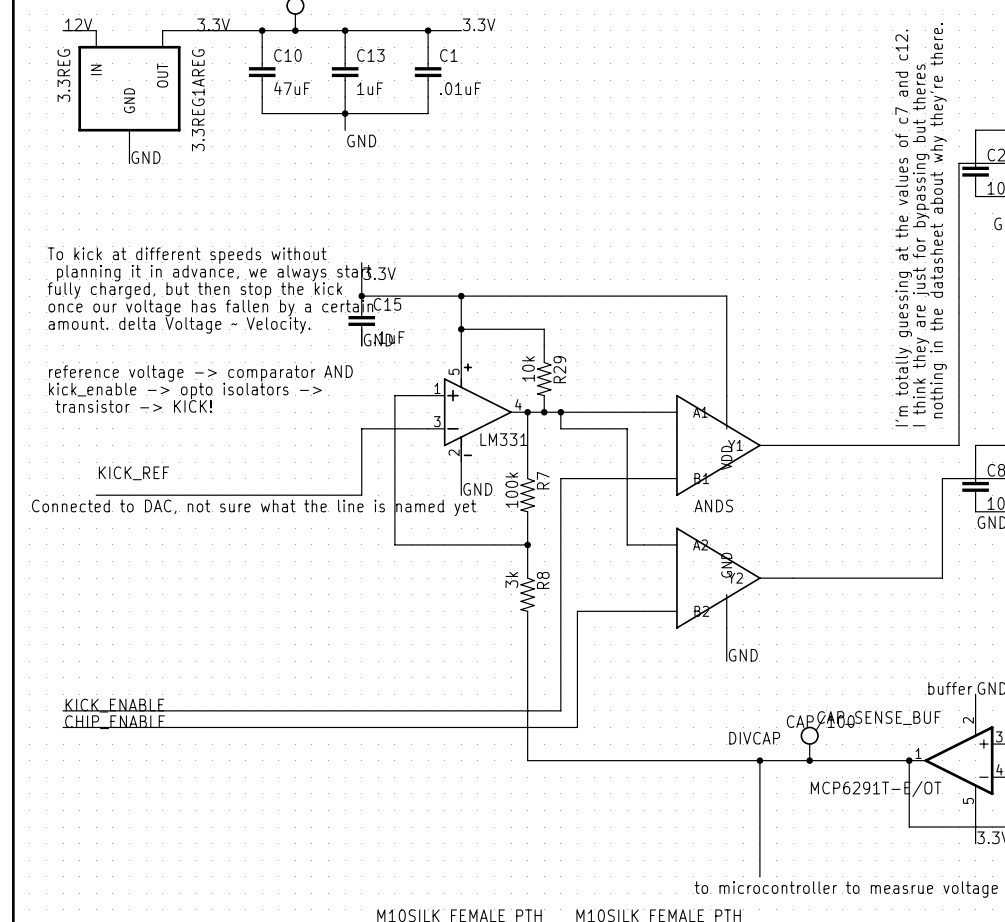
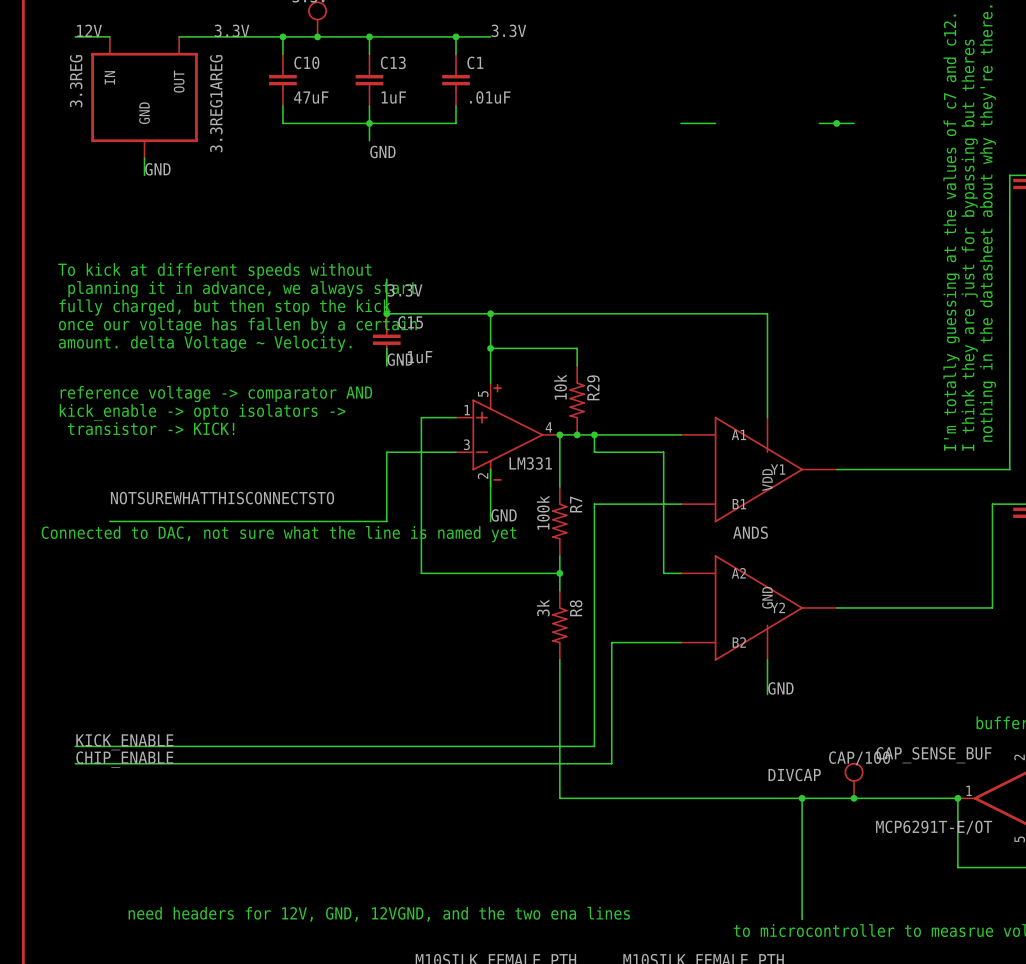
wire: none -> (680, 123) (715, 123)
wire: none -> (819, 123) (854, 123)
junction: none -> (836, 123)
label: KICK_REF (133, 473) -> NOTSUREWHATTHISCONNECTSTO (222, 498)
text: none -> need headers for 12V, GND, 12VGND, and the two ena lines (379, 914)

